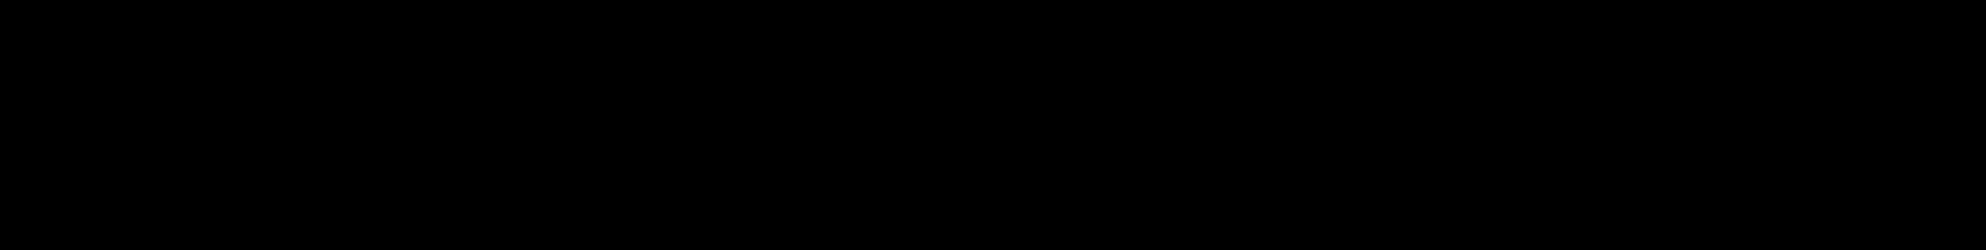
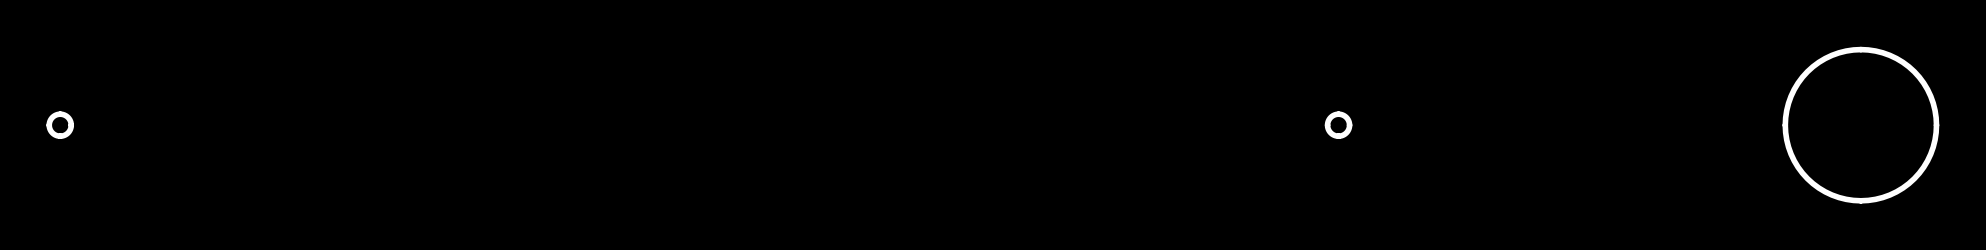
board edge: none -> (1860, 49) (1889, 55) (1914, 71) (1930, 96) (1936, 125) (1930, 154) (1914, 178) (1889, 195) (1860, 200) (1831, 195) (1807, 178) (1791, 154) (1785, 125) (1791, 96) (1807, 71) (1831, 55) (1860, 49)
board edge: none -> (60, 114) (52, 117) (49, 125) (52, 132) (60, 136) (68, 132) (71, 125) (68, 117) (60, 114)
board edge: none -> (1338, 114) (1330, 117) (1327, 125) (1330, 132) (1338, 136) (1346, 132) (1349, 125) (1346, 117) (1338, 114)

